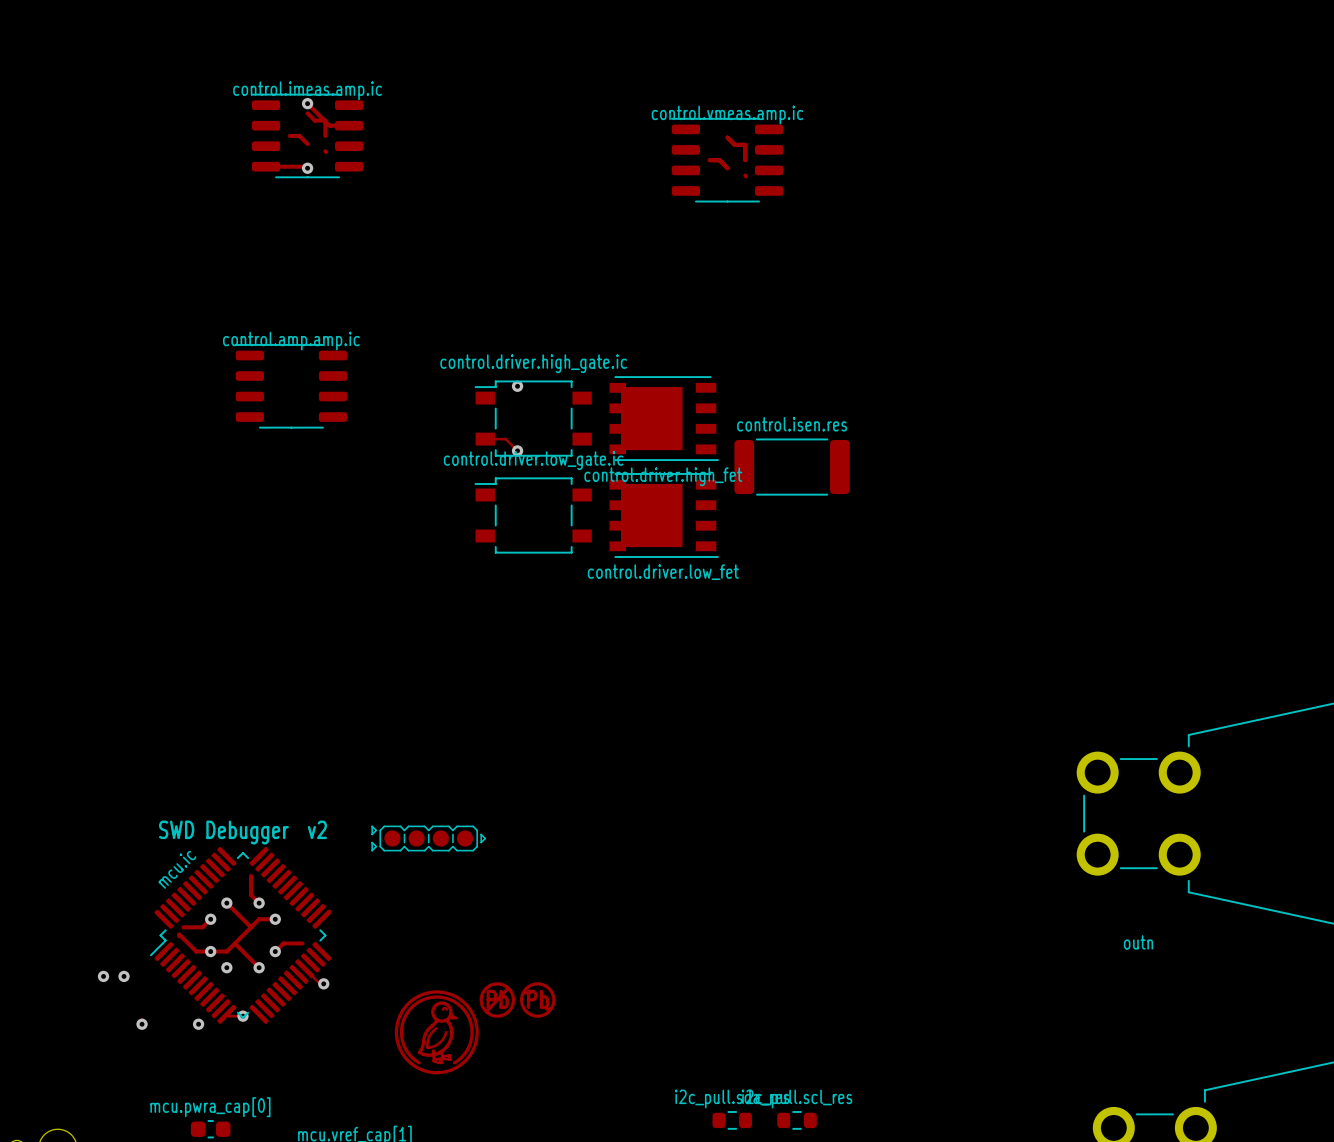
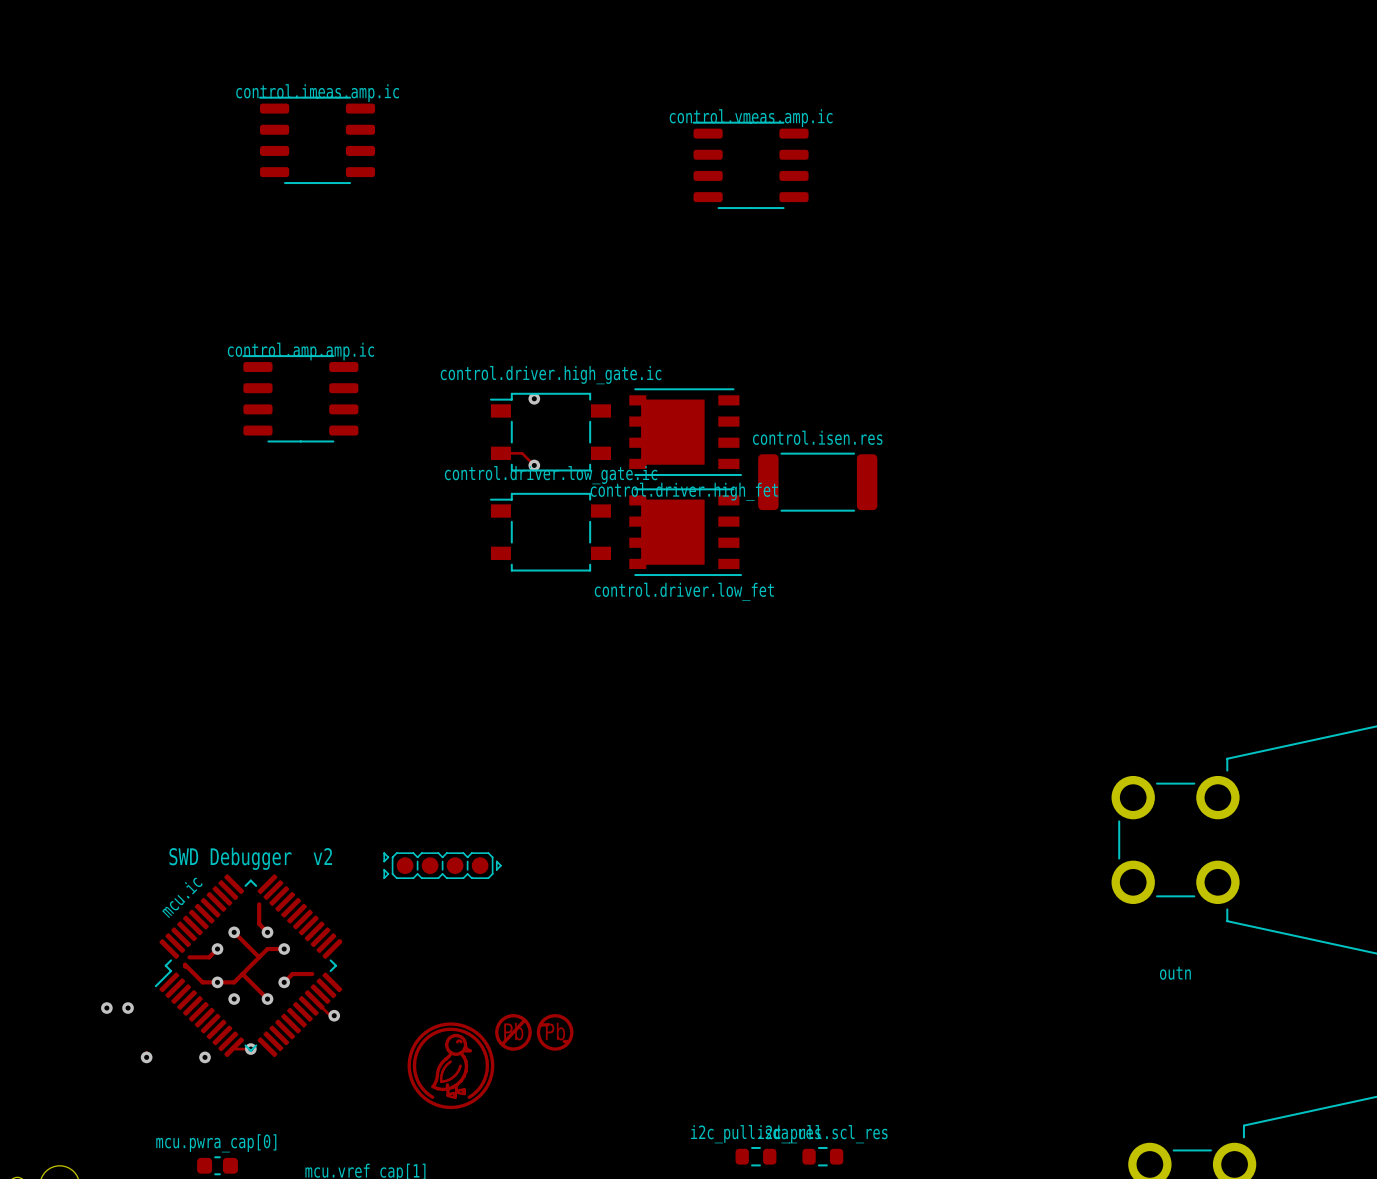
track: (307, 103) (329, 125) (349, 125) -> none
via: (307, 103) -> none
track: (307, 113) (314, 120) (325, 120) (325, 135) -> none
track: (289, 135) (299, 135) (307, 144) -> none
track: (727, 137) (734, 144) (745, 144) (745, 160) -> none
track: (325, 151) (326, 152) -> none
track: (709, 160) (719, 160) (727, 168) -> none
track: (266, 166) (307, 168) -> none
via: (307, 168) -> none
track: (745, 175) (746, 176) -> none

